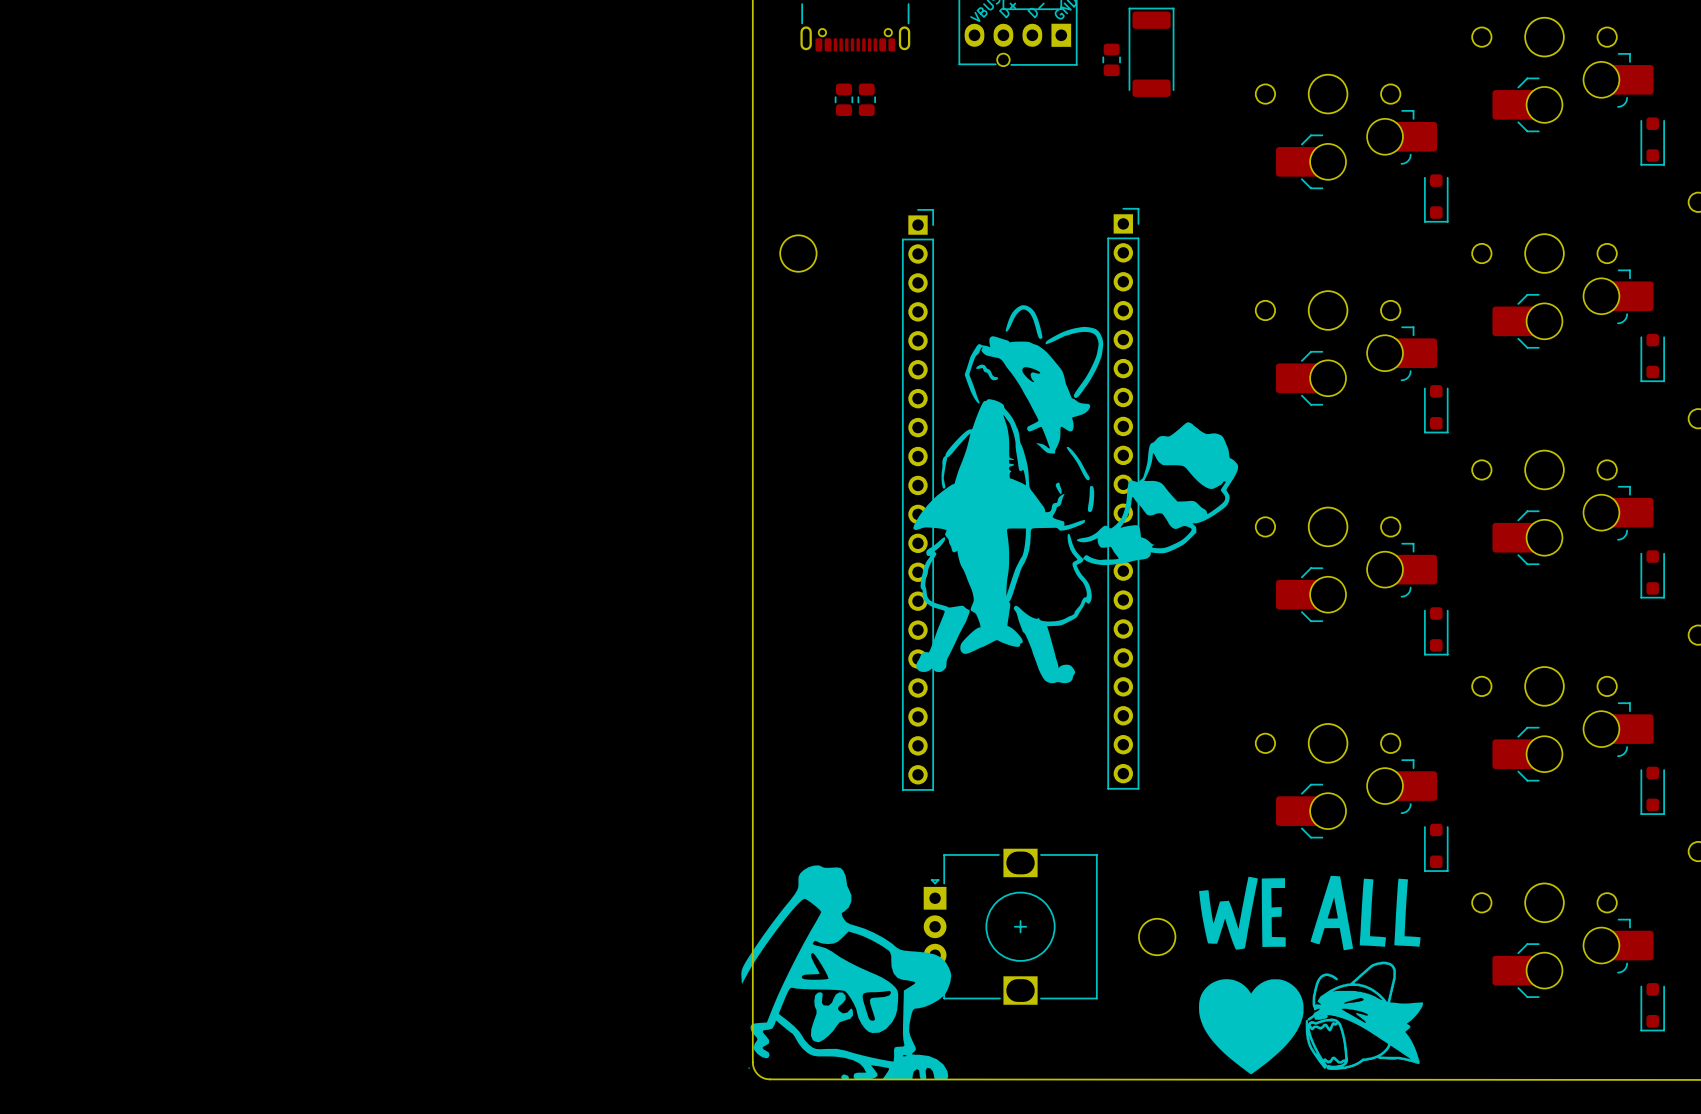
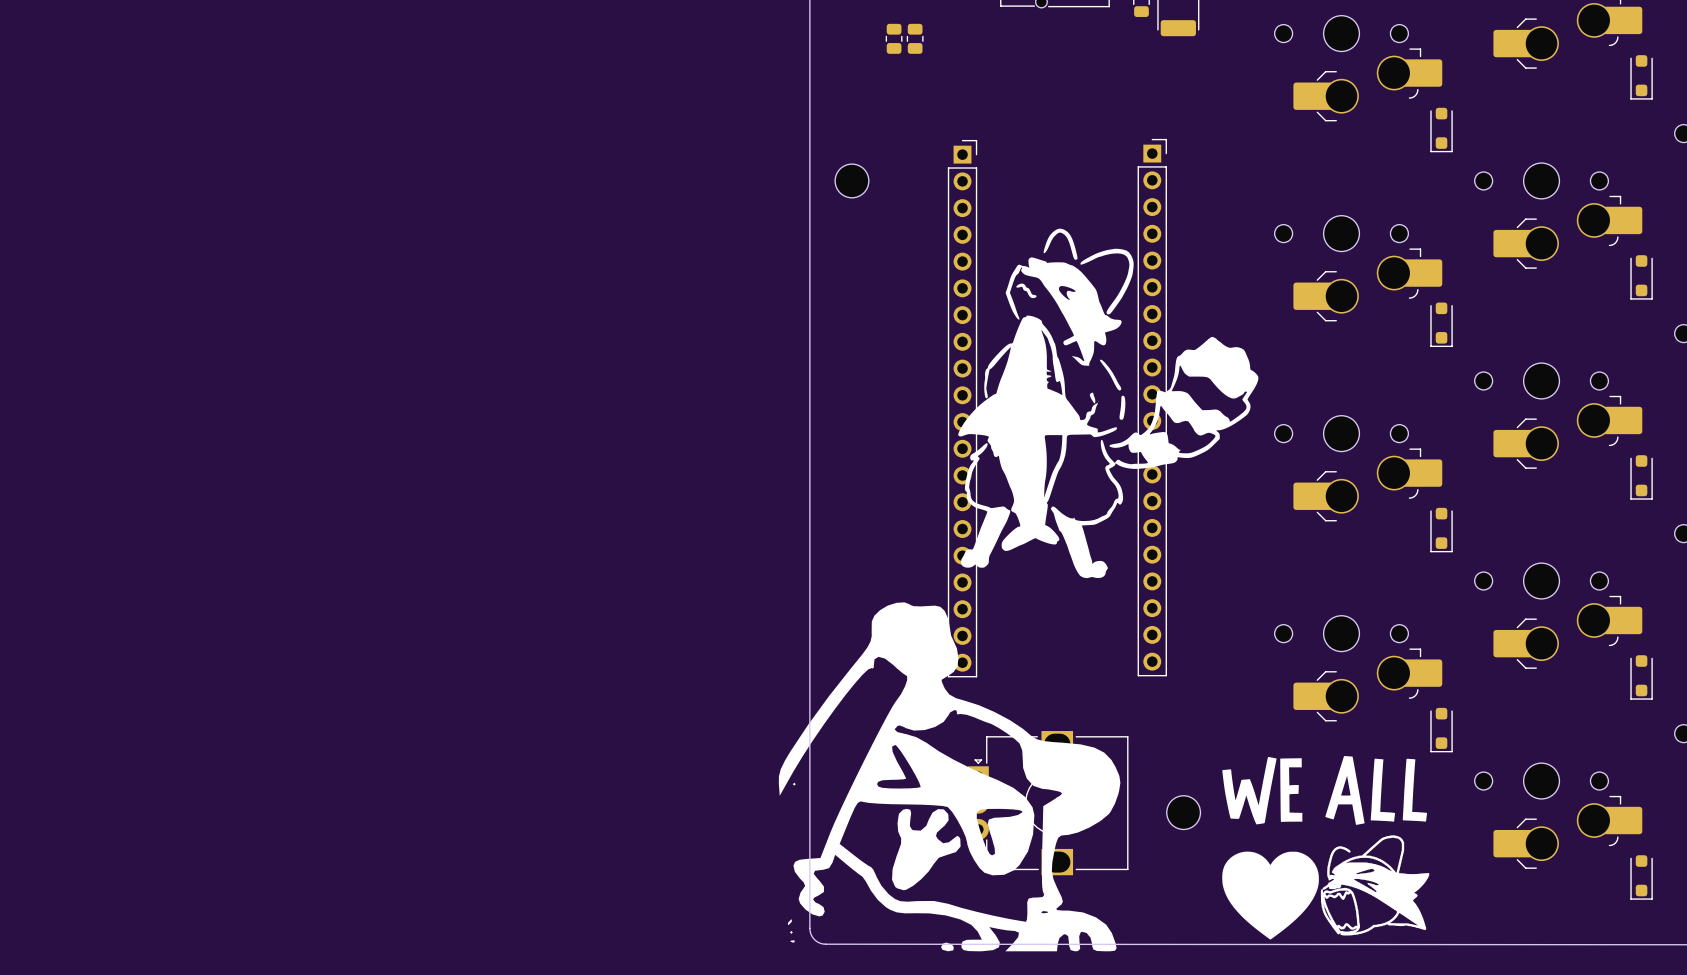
drawing: none -> [778, 602, 1121, 952]
drawing: [741, 865, 952, 1080] -> none

